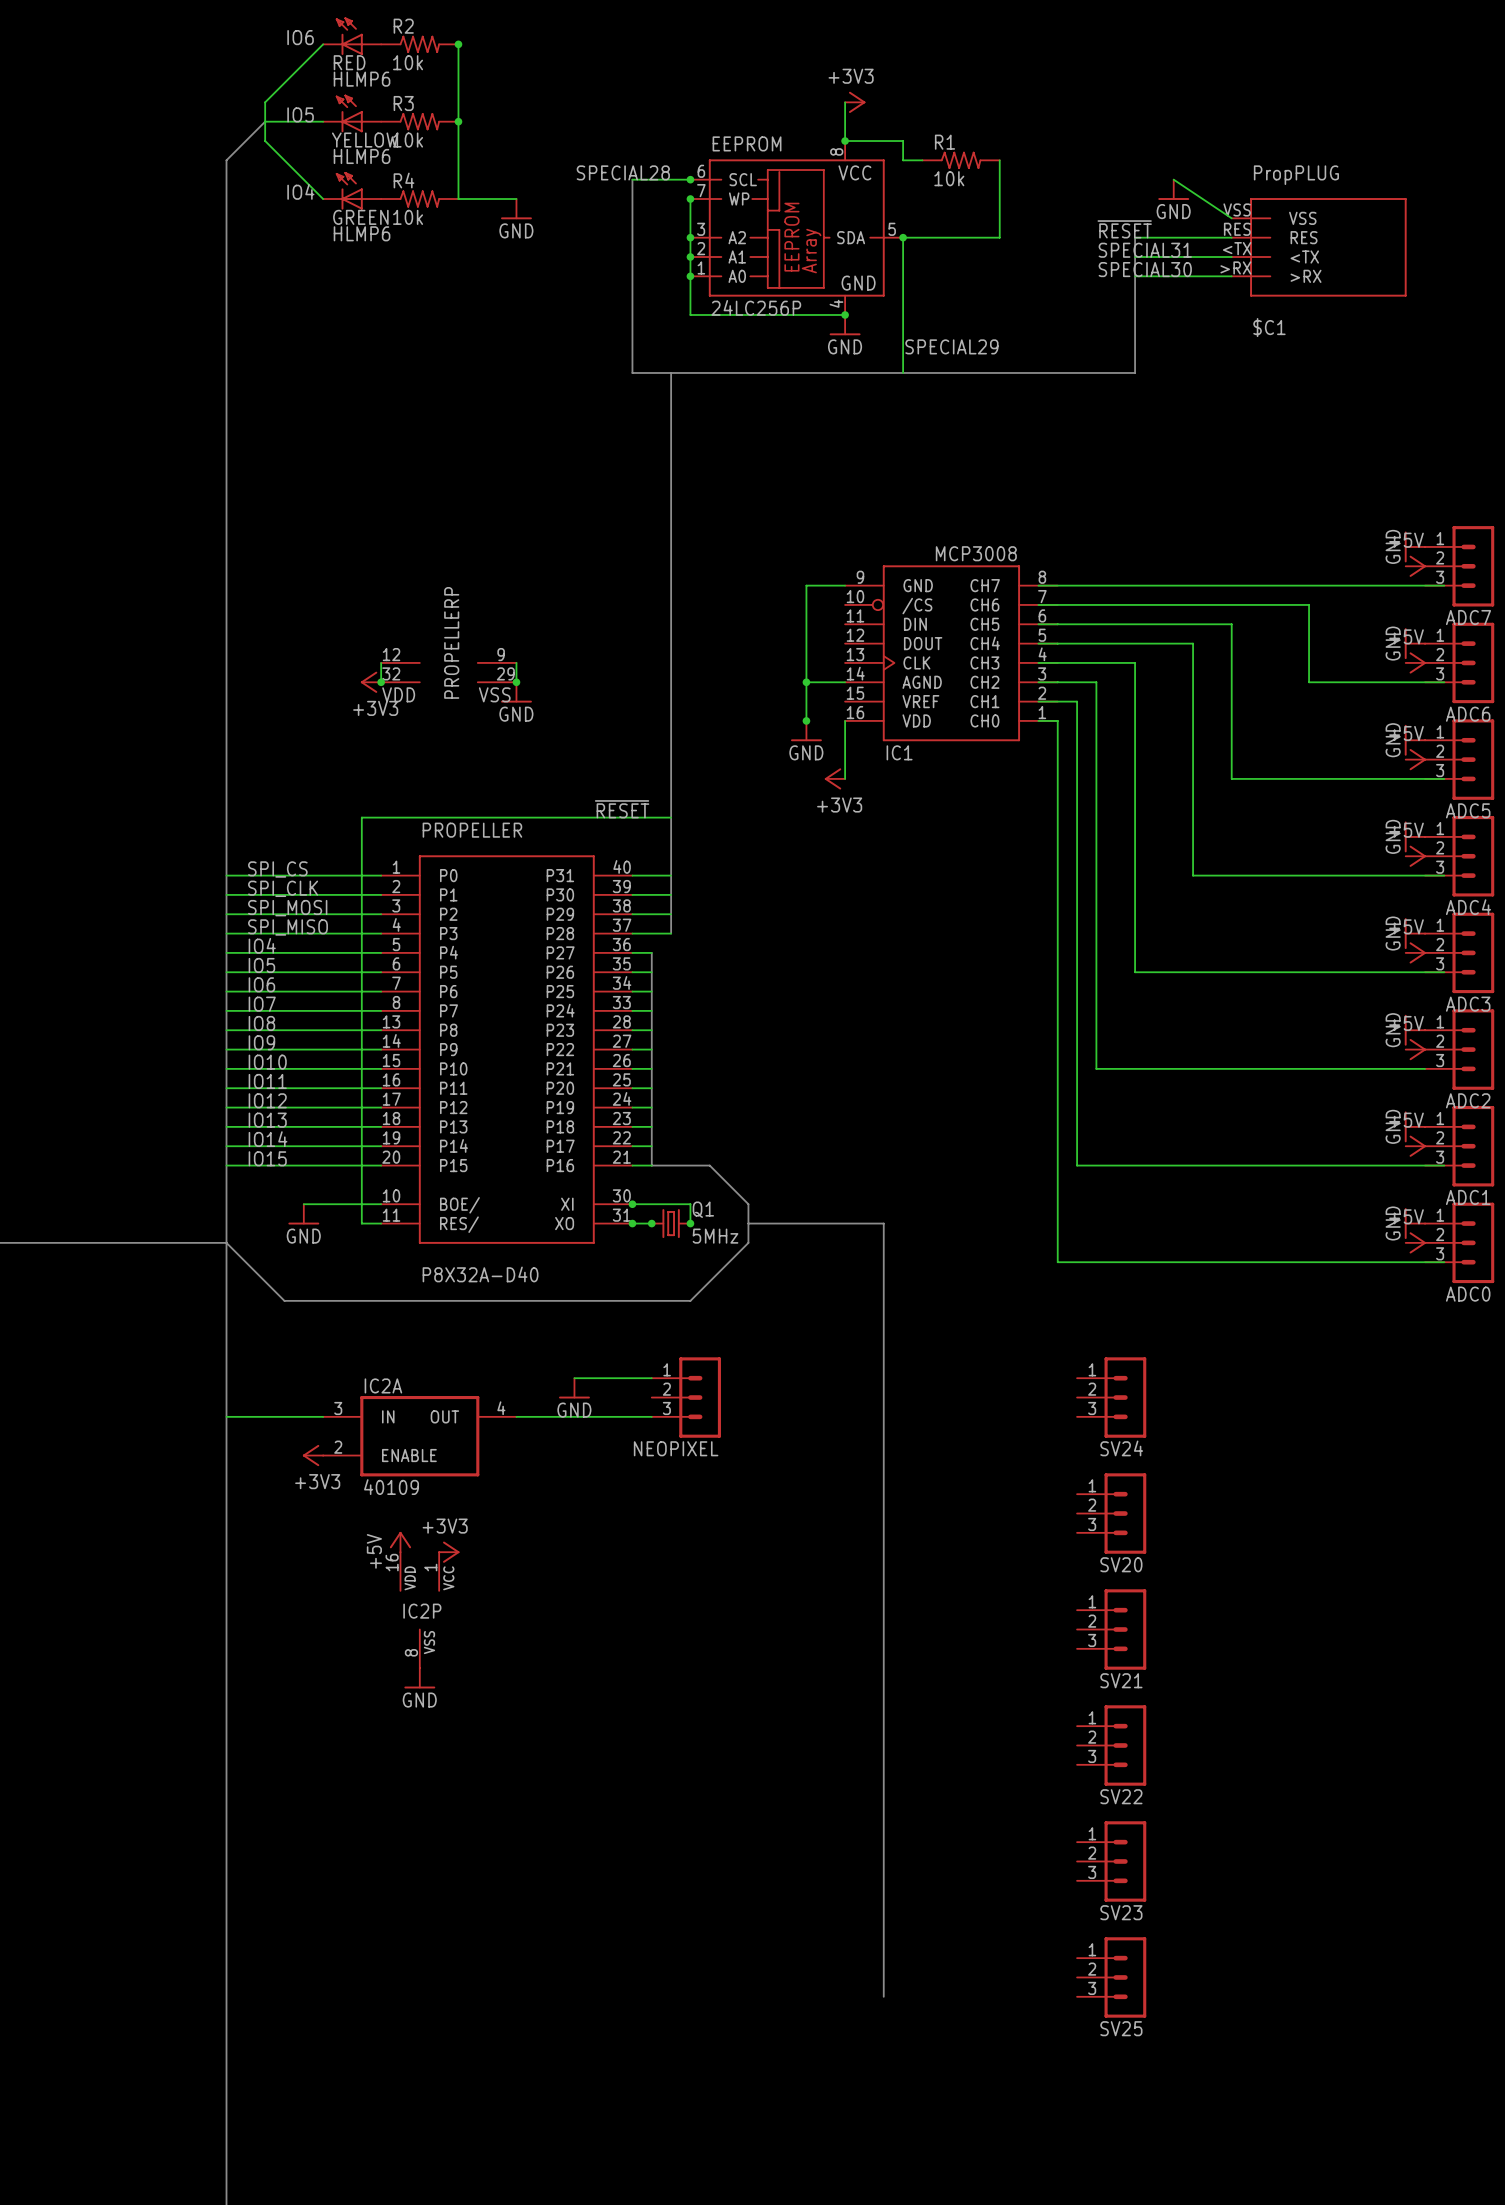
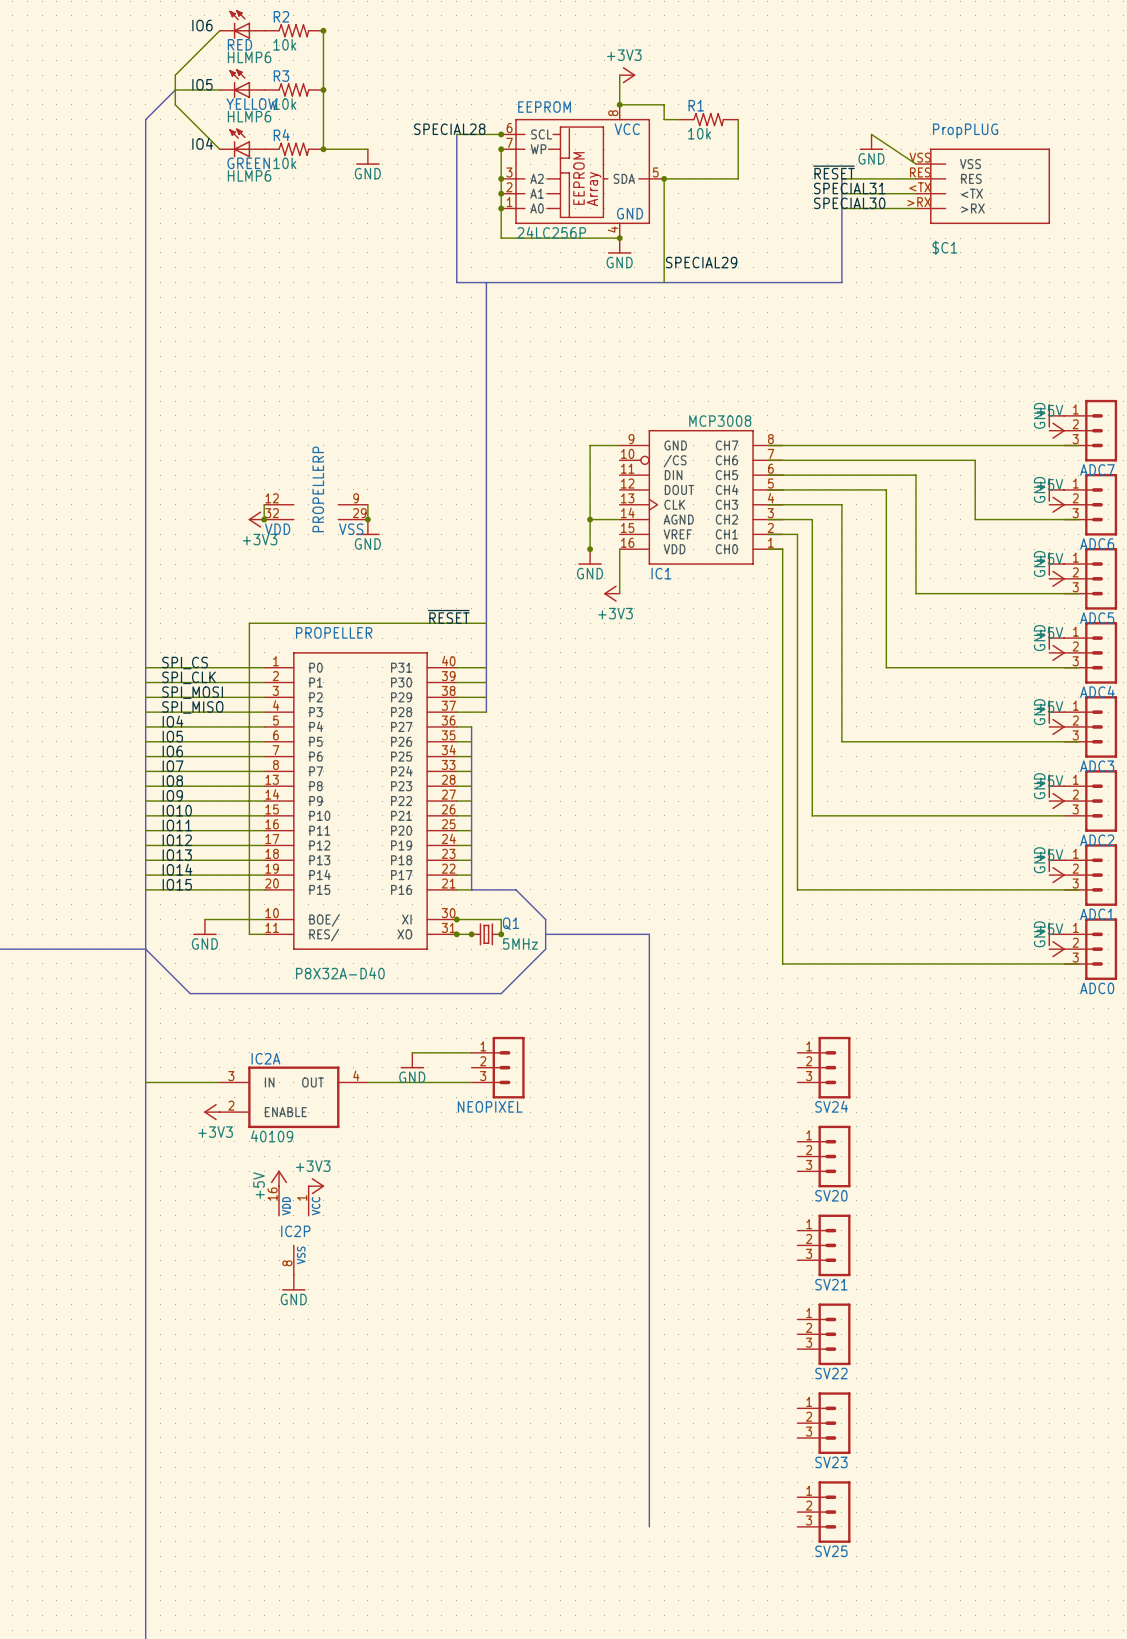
junction: none -> (323, 149)

